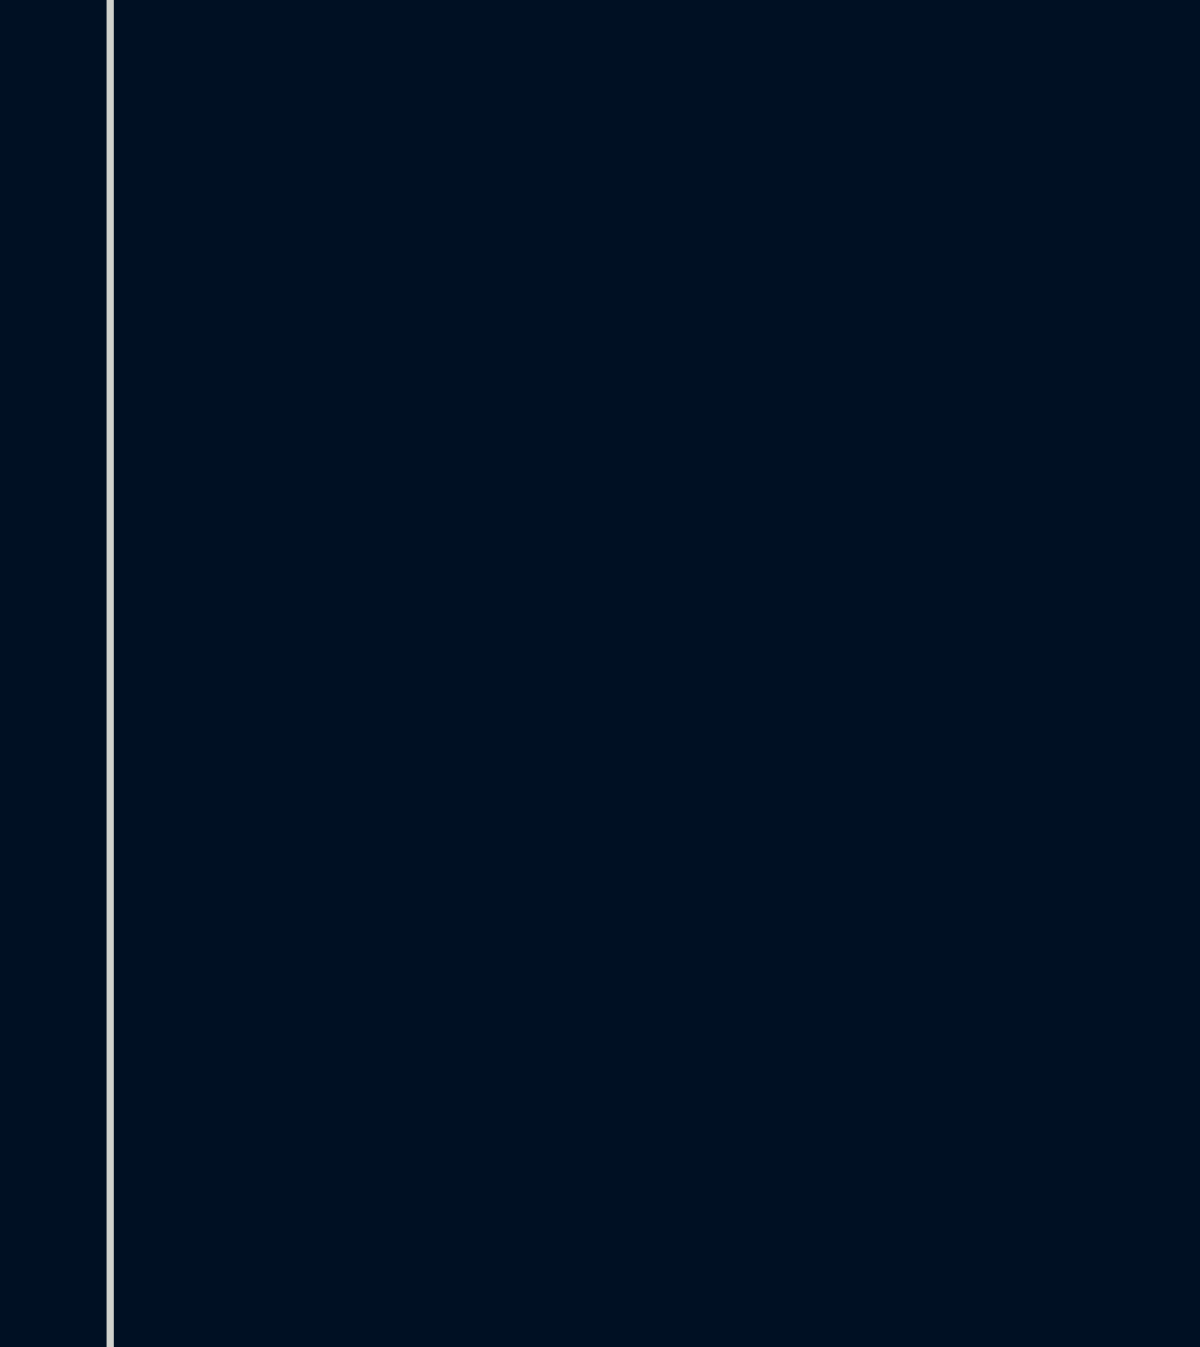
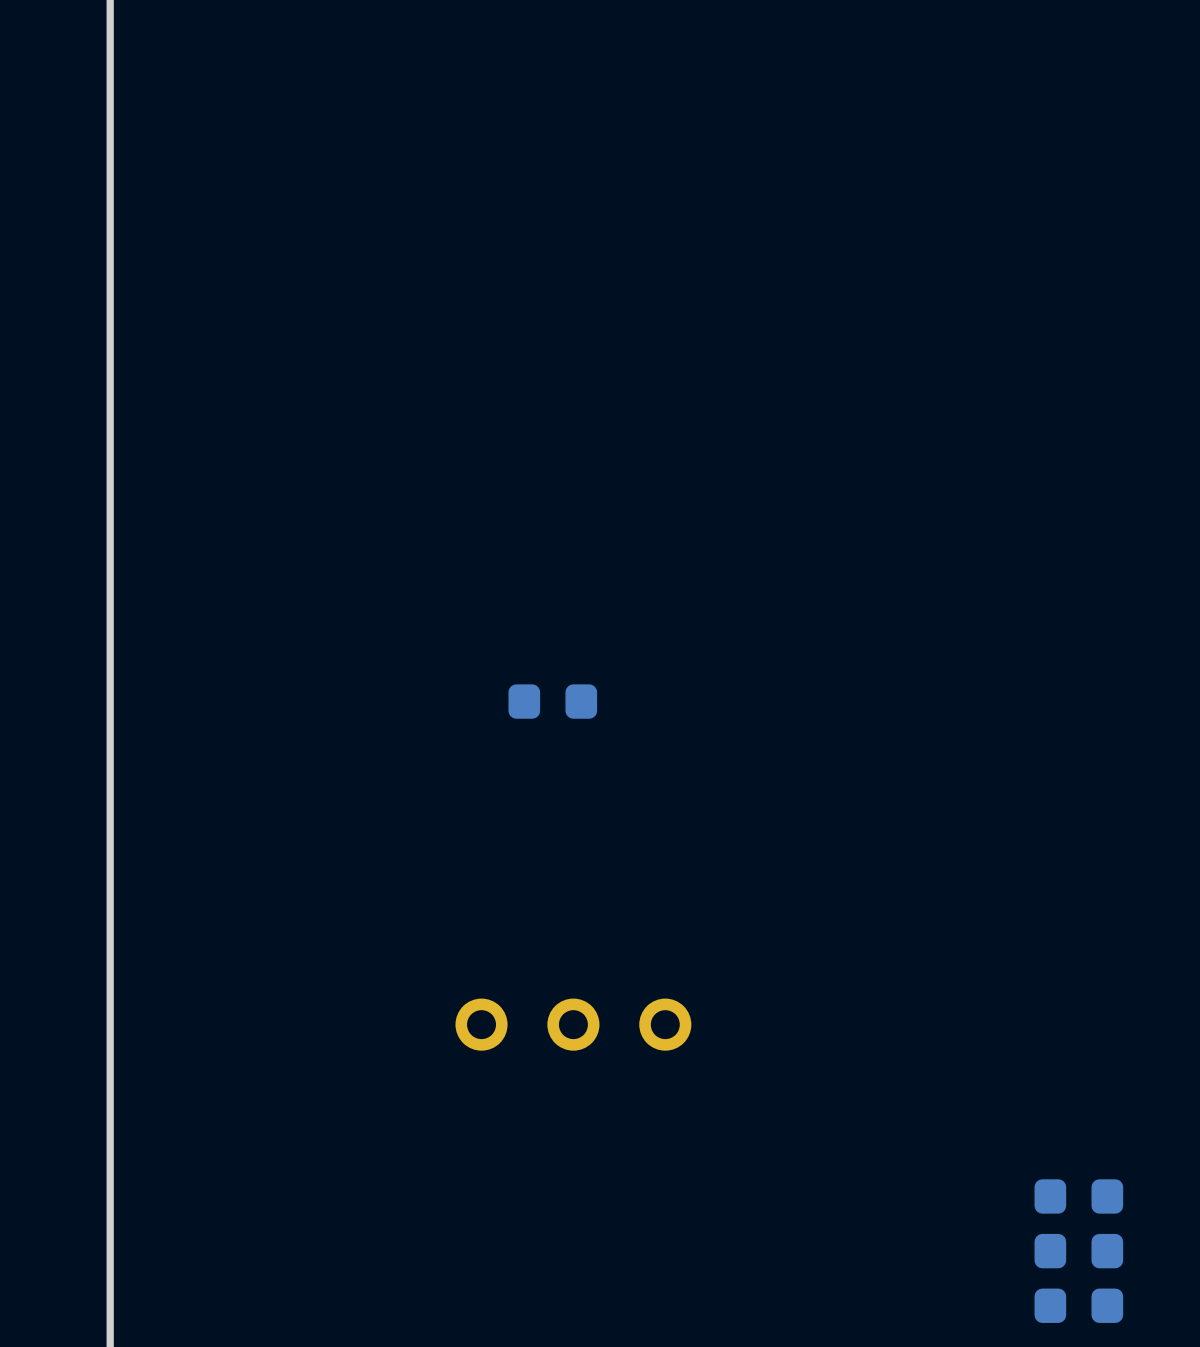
part: none -> (552, 701)
part: none -> (573, 1024)
part: none -> (1078, 1196)
part: none -> (1078, 1251)
part: none -> (1078, 1305)

